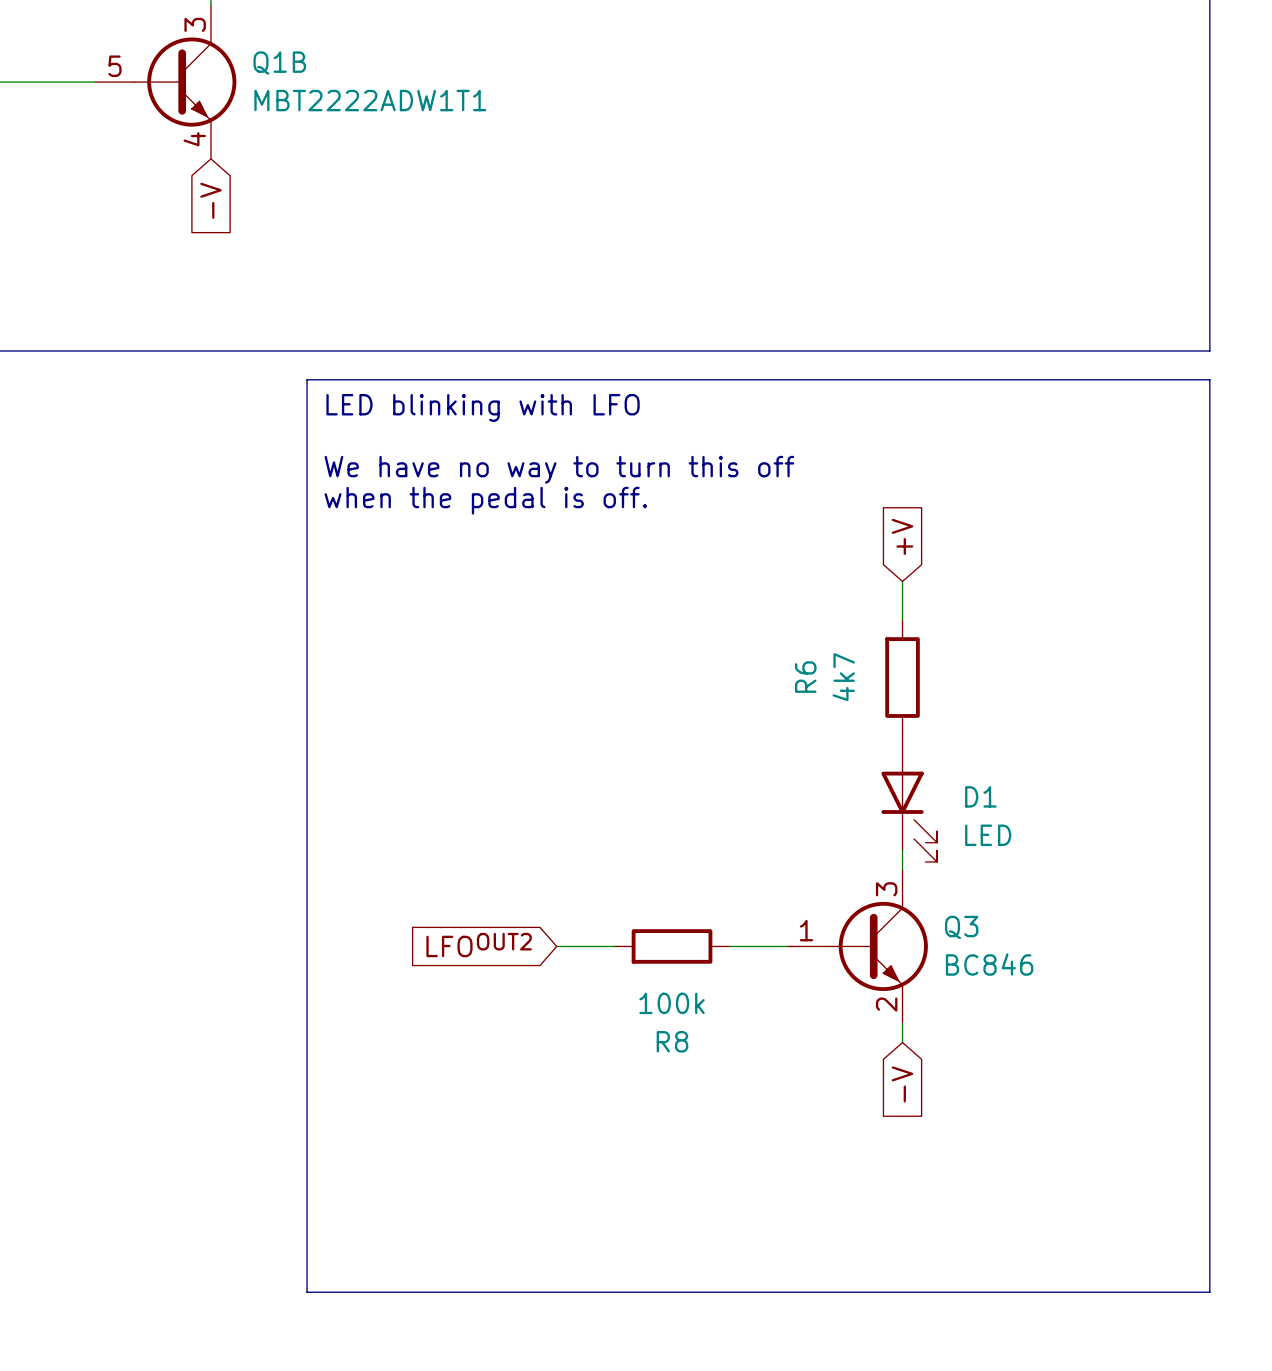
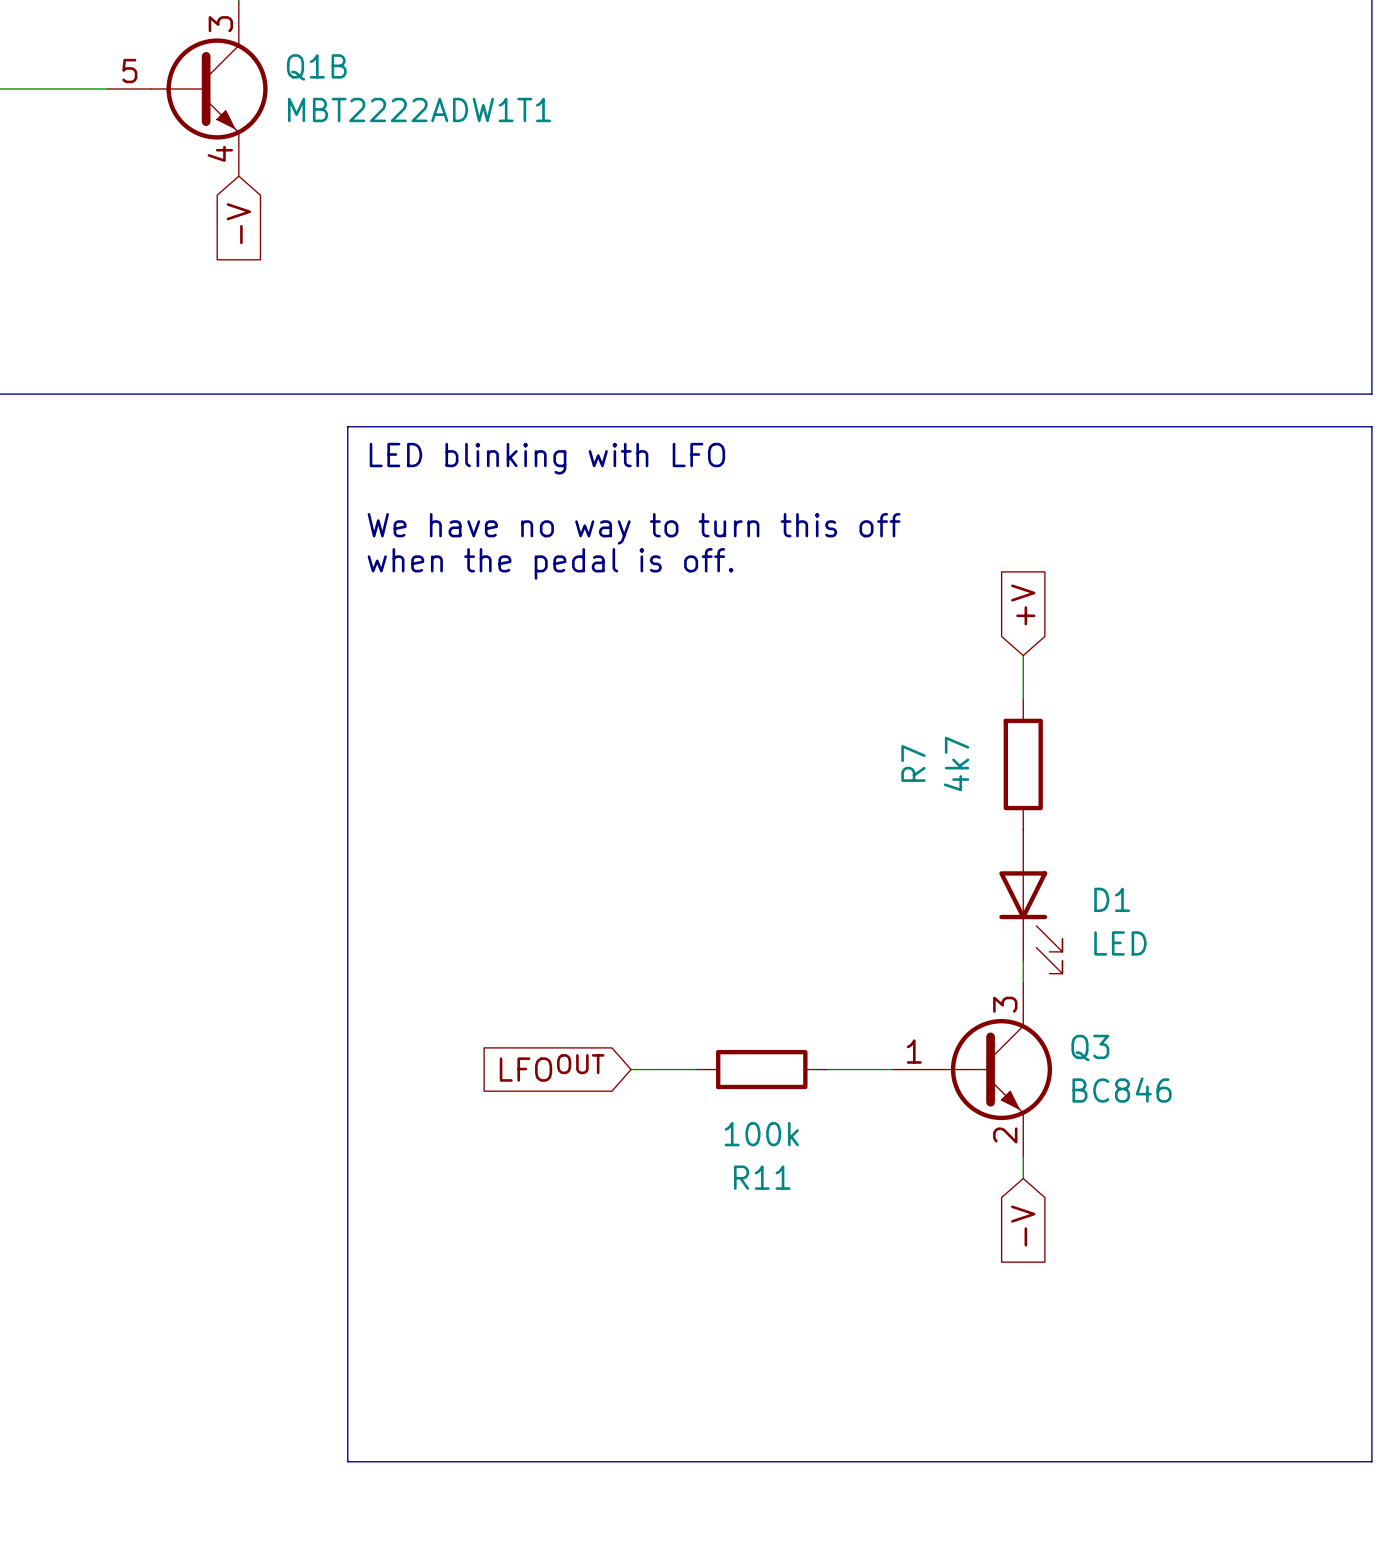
R6 name: R6 (805, 677) -> R7 (913, 763)
global label: LFOOUT2 (479, 945) -> LFOOUT (552, 1067)
R8 name: R8 (672, 1041) -> R11 (762, 1177)

